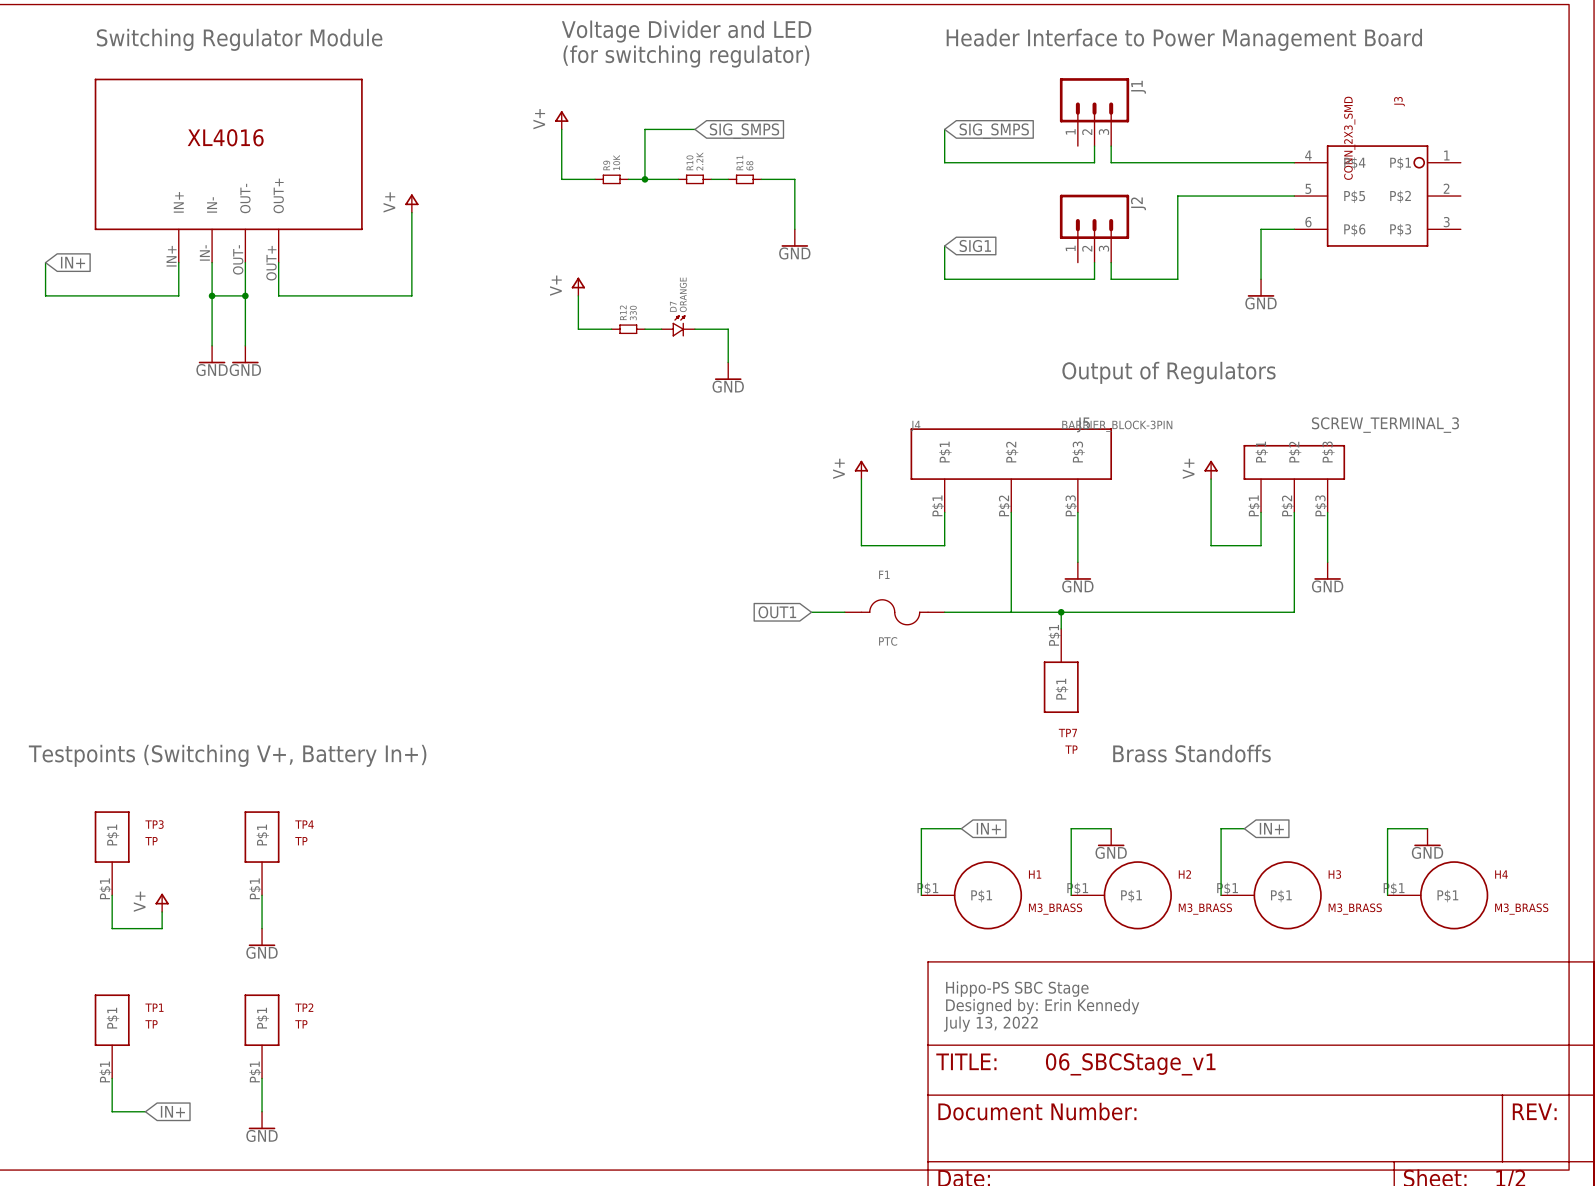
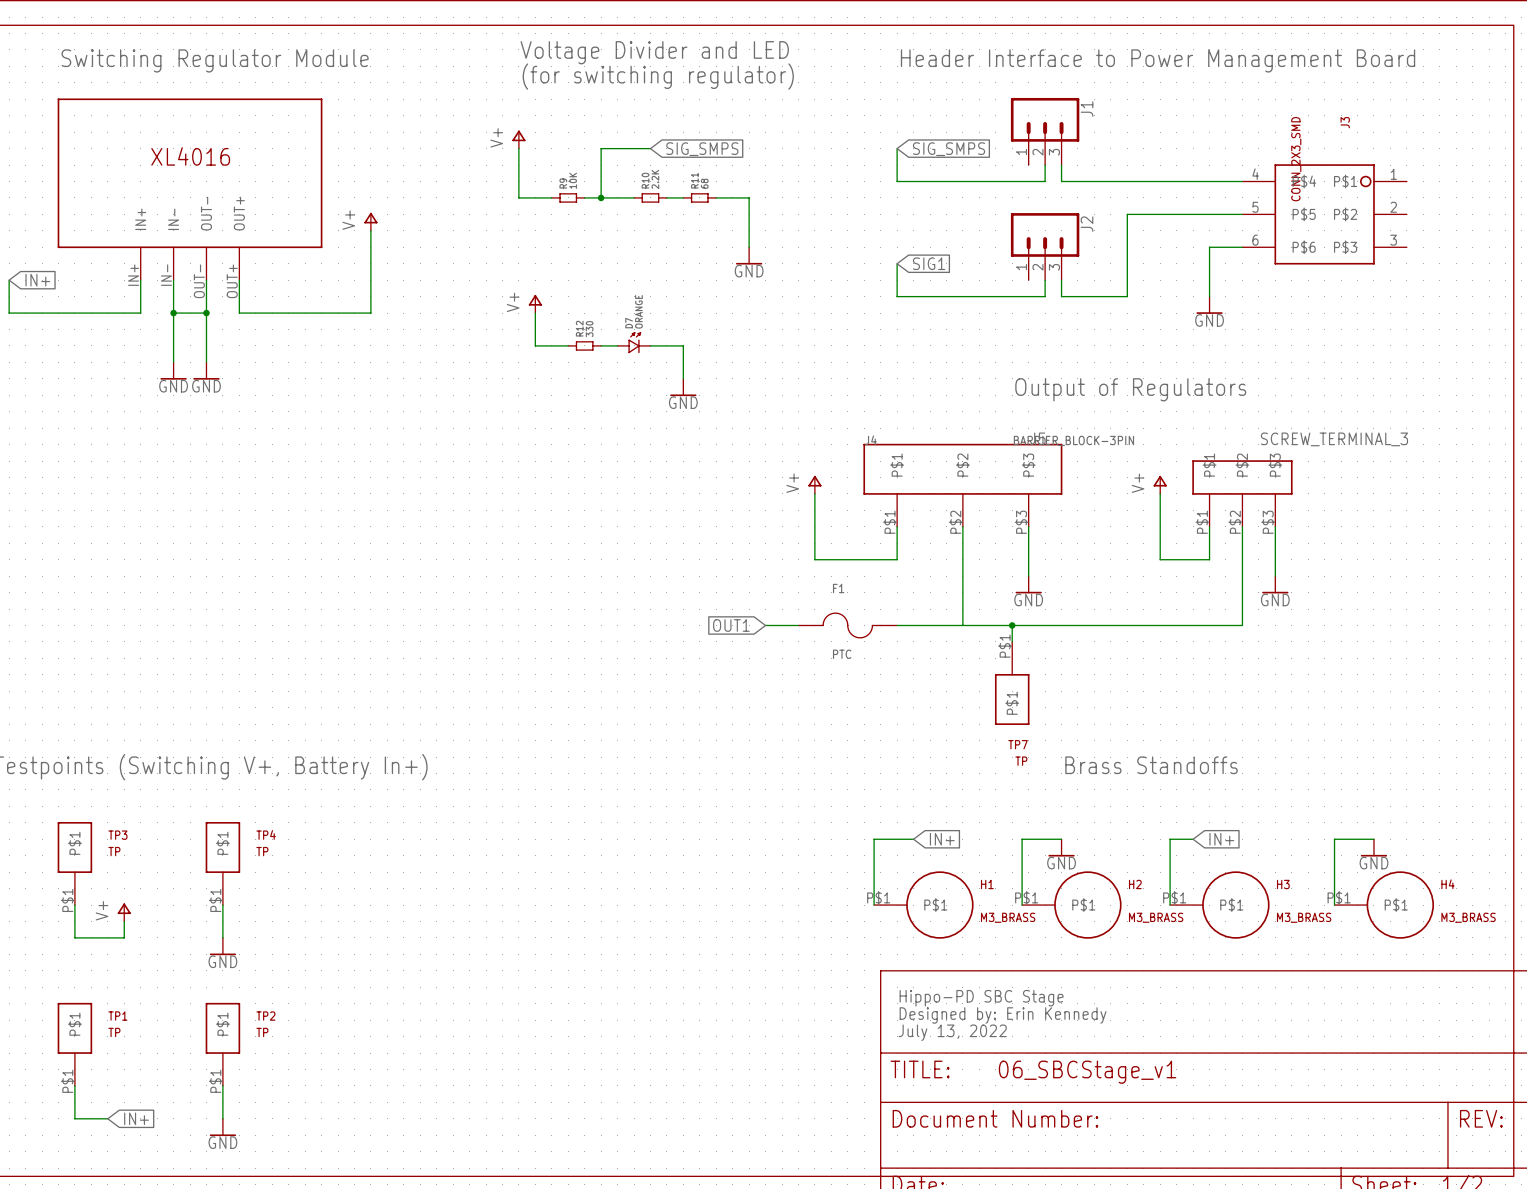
text: Hippo-PS SBC Stage (1017, 989) -> Hippo-PD SBC Stage (981, 998)

